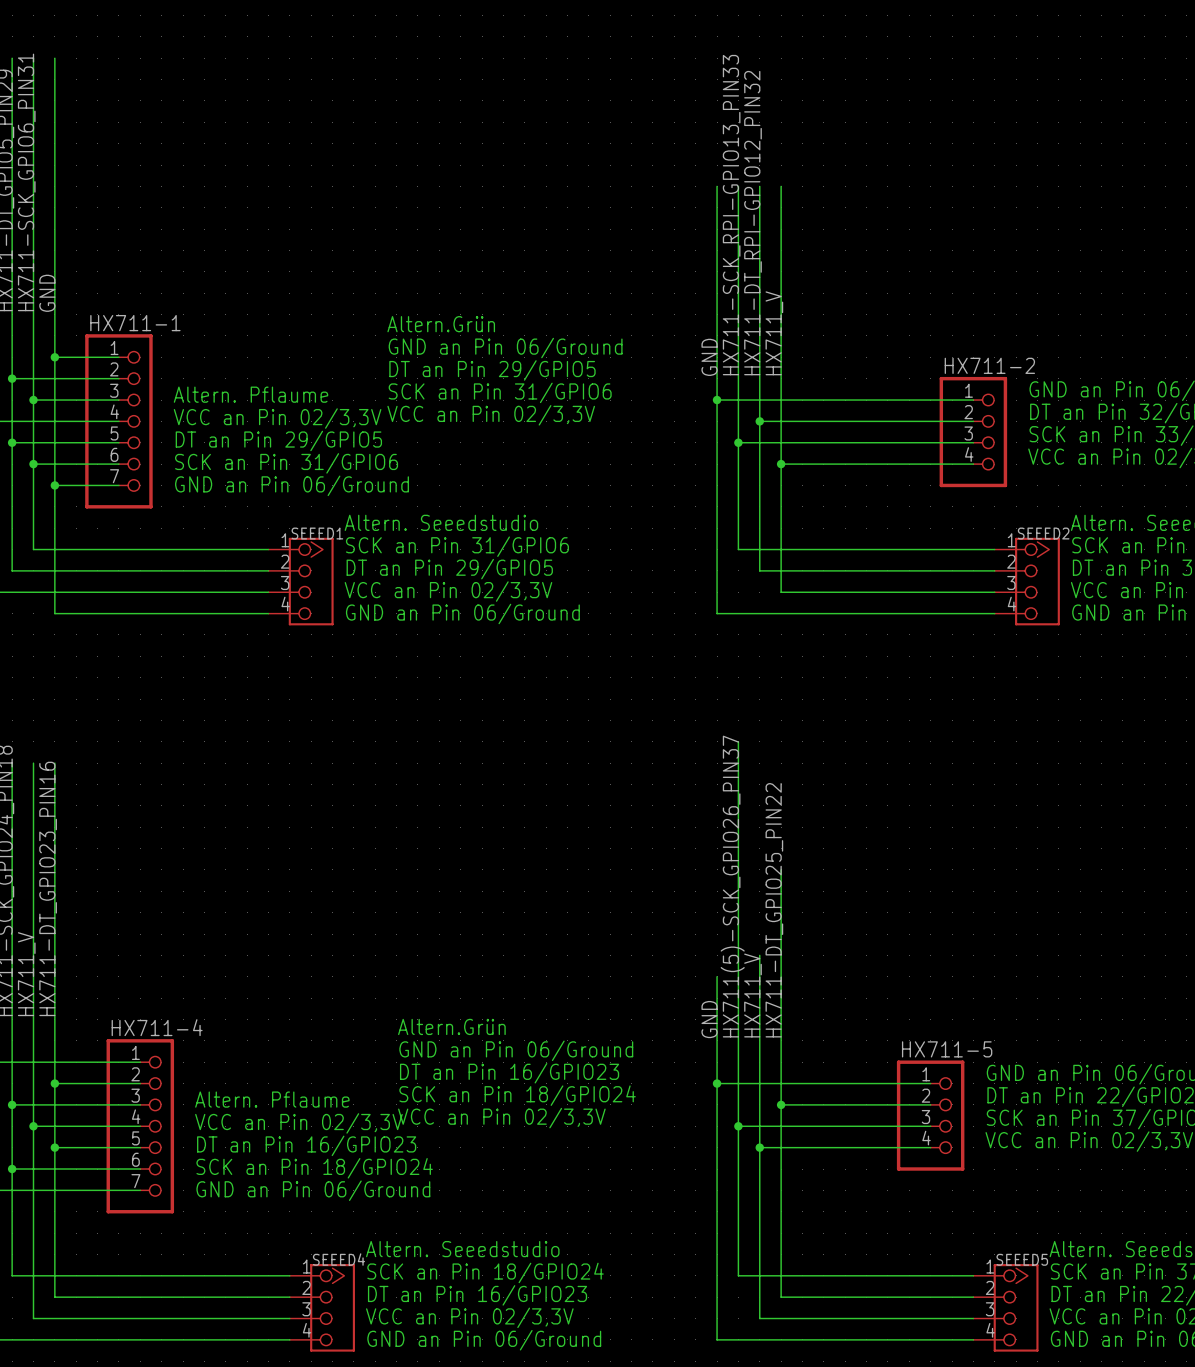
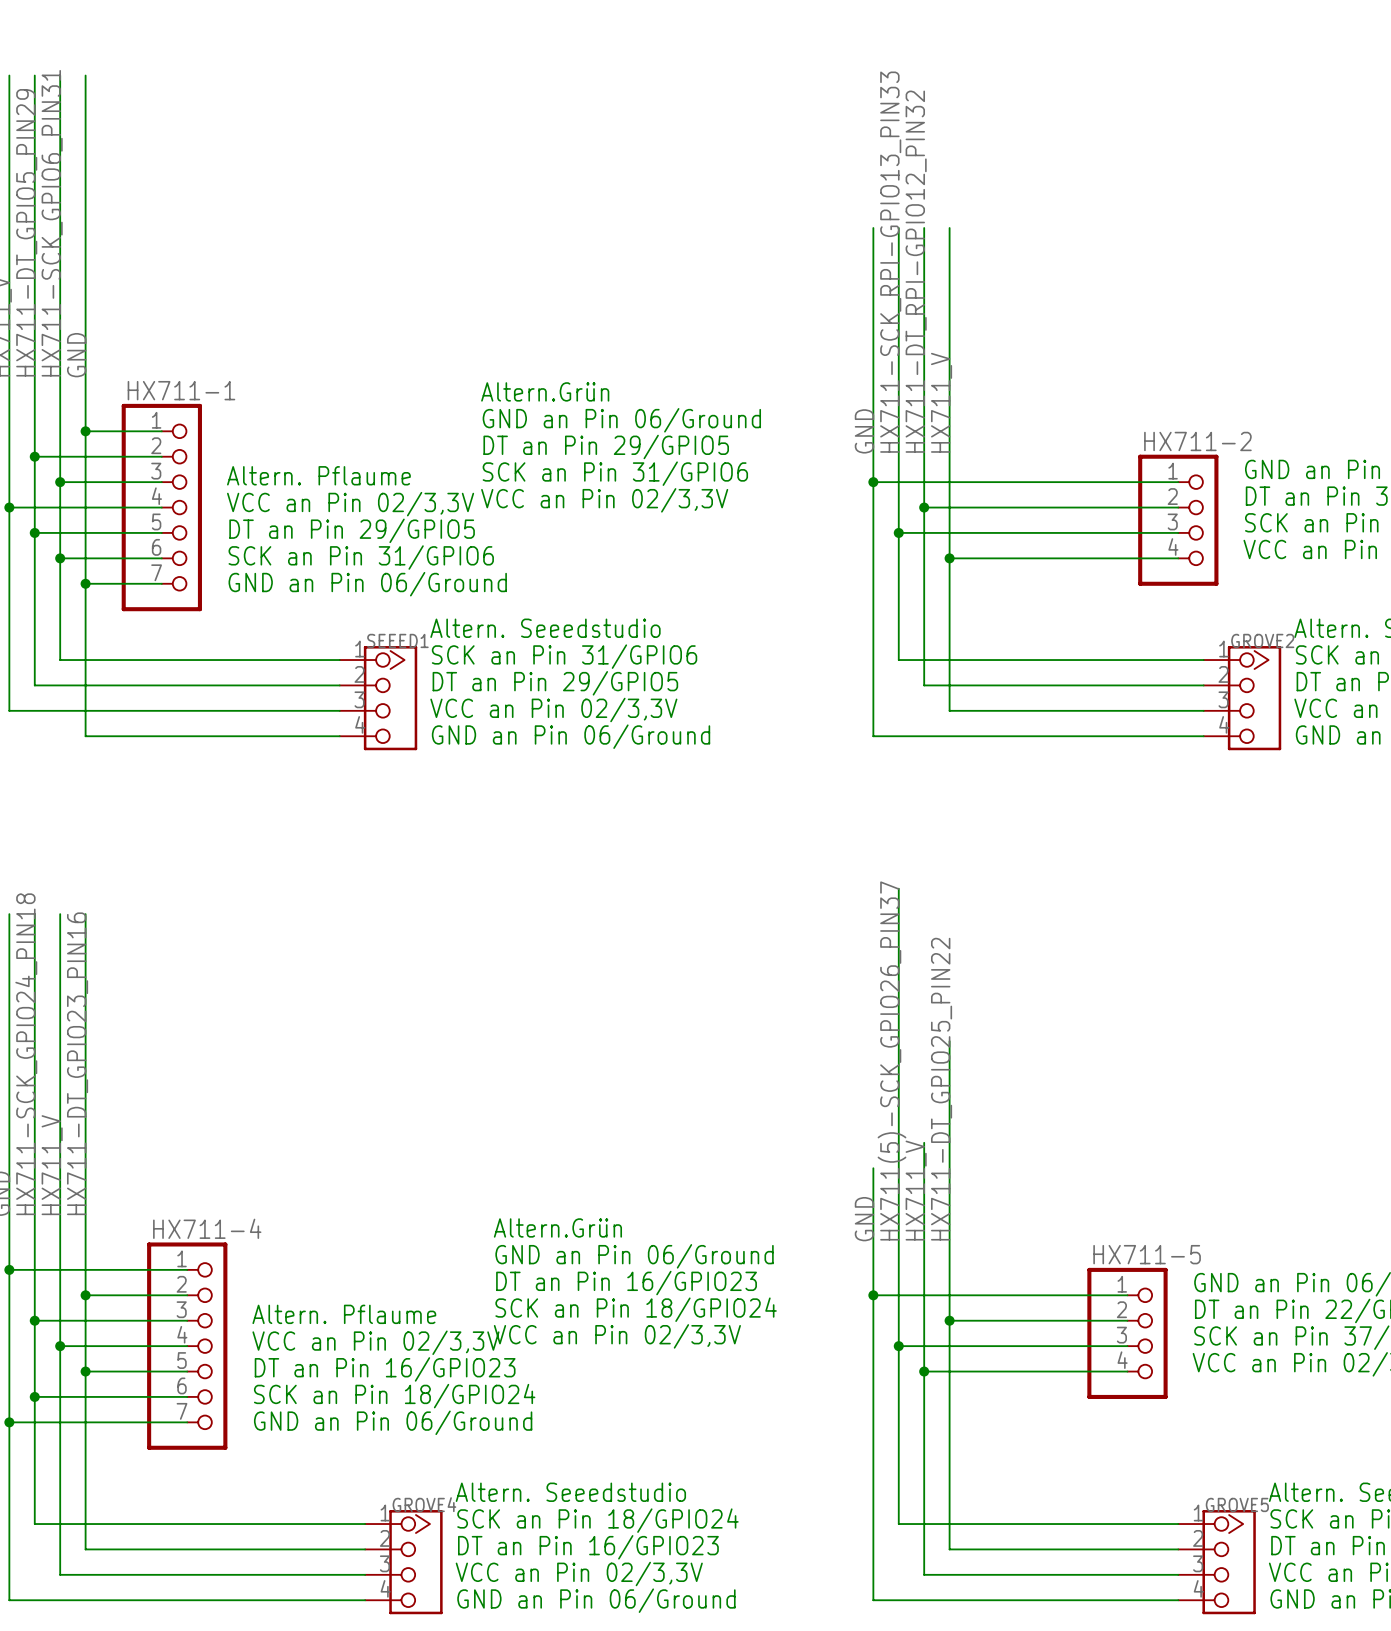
SEEED2 name: SEEED2 (1043, 533) -> GROVE2 (1262, 640)
SEEED4 name: SEEED4 (338, 1259) -> GROVE4 (424, 1504)
SEEED5 name: SEEED5 (1022, 1259) -> GROVE5 (1237, 1504)

